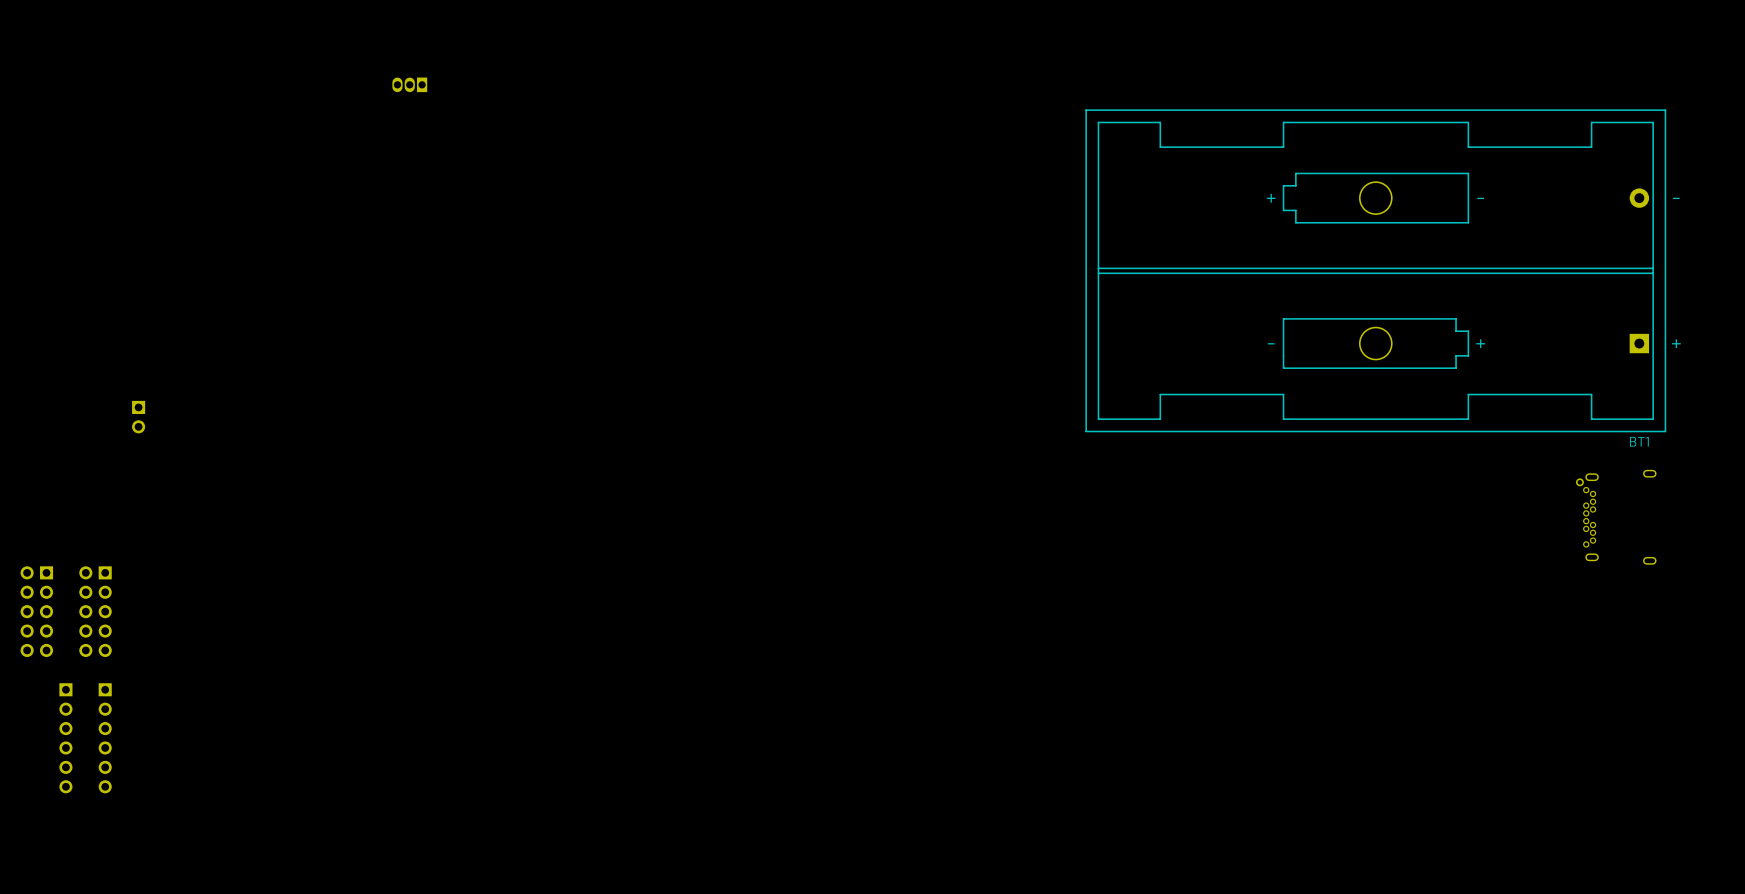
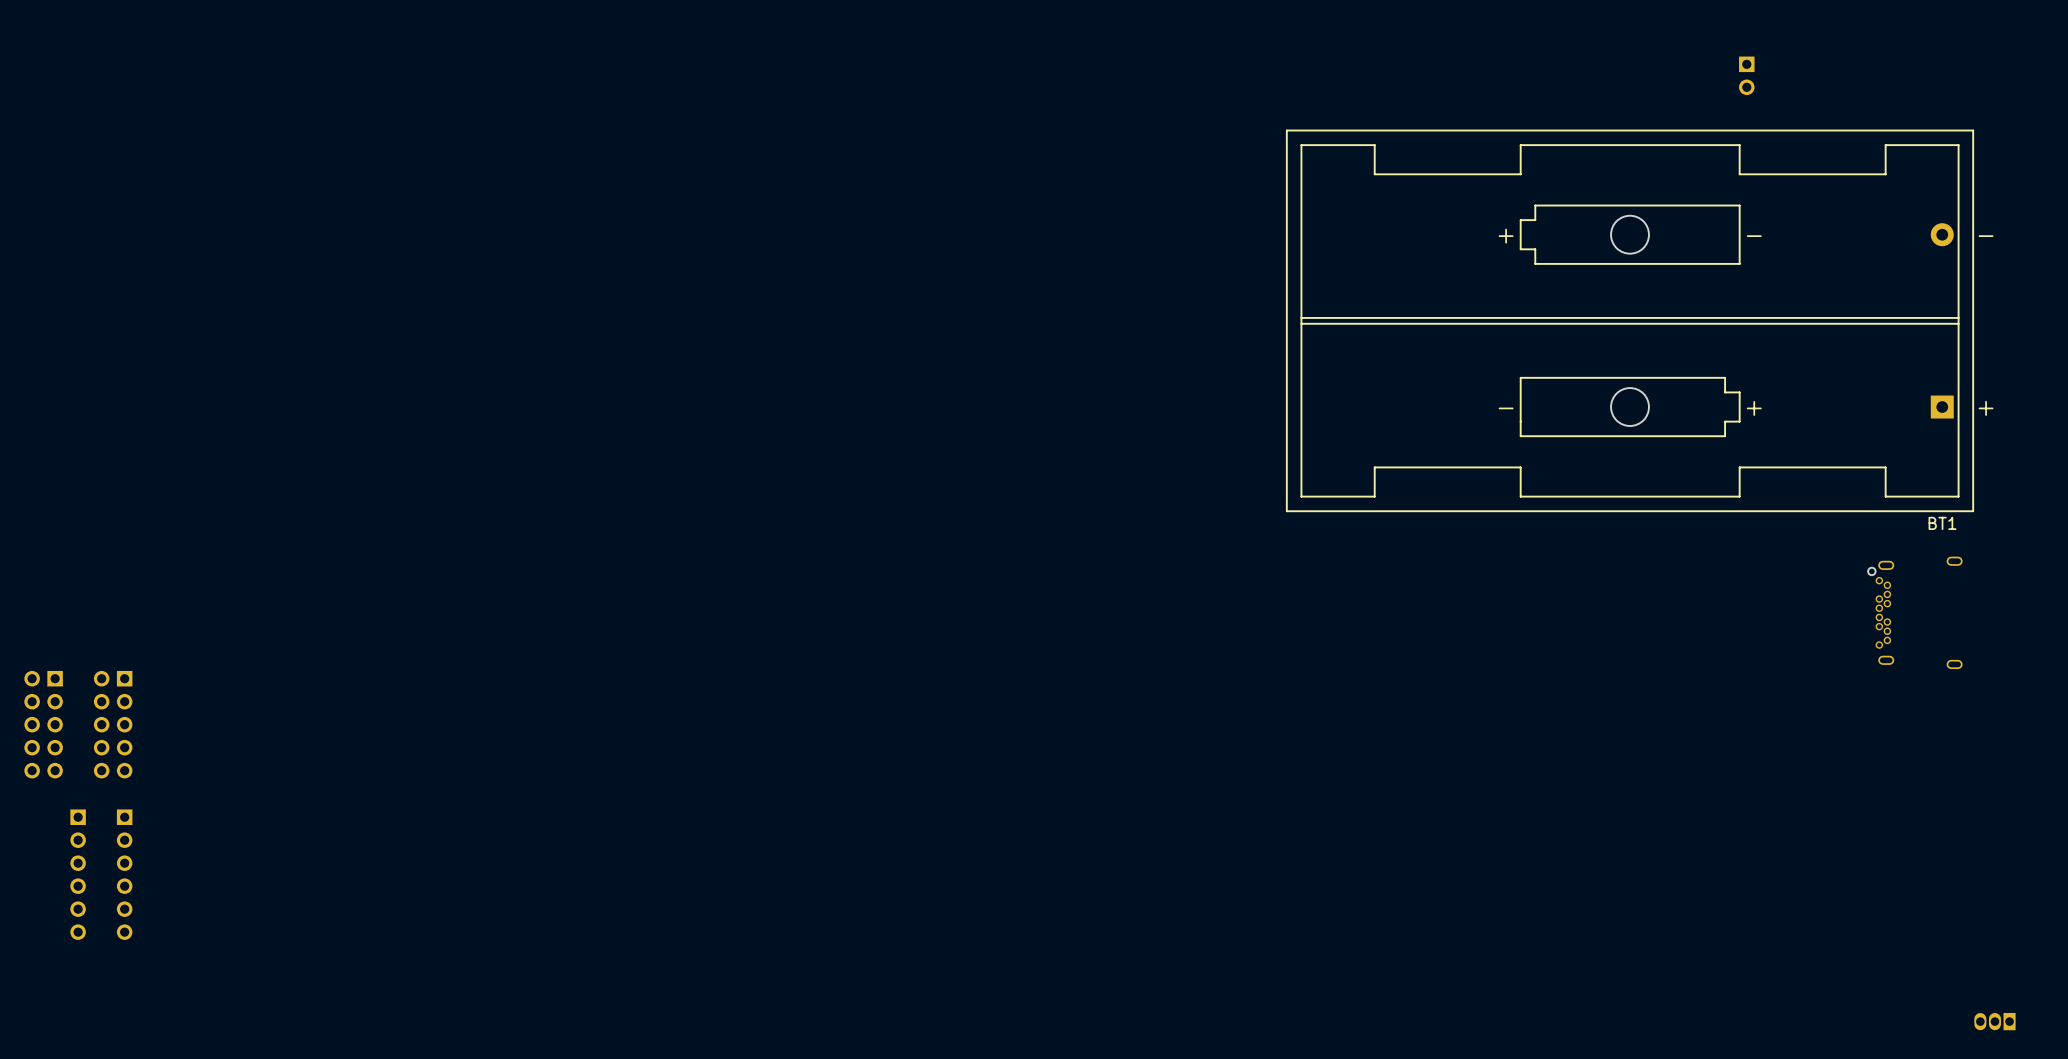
part: none -> (1746, 75)
part: (409, 84) -> none
part: (138, 417) -> none
part: none -> (1994, 1021)

